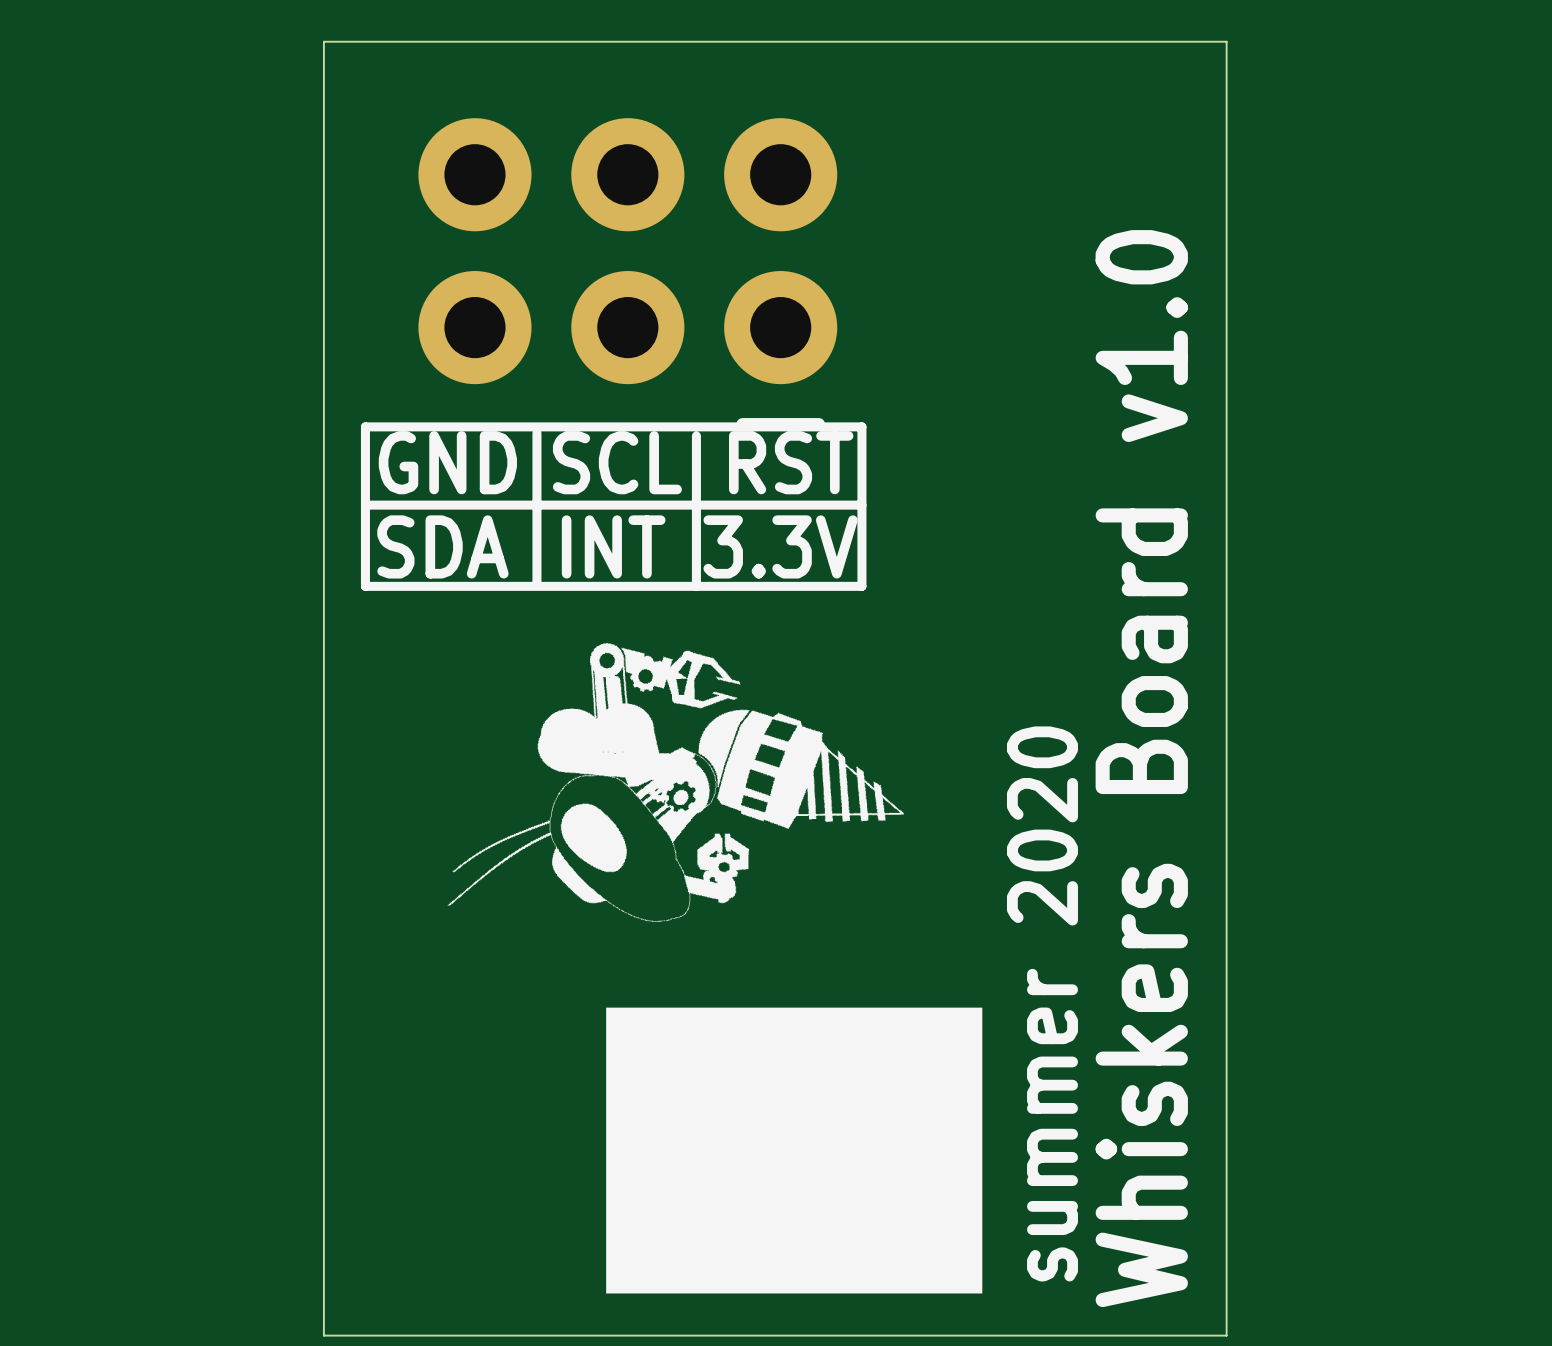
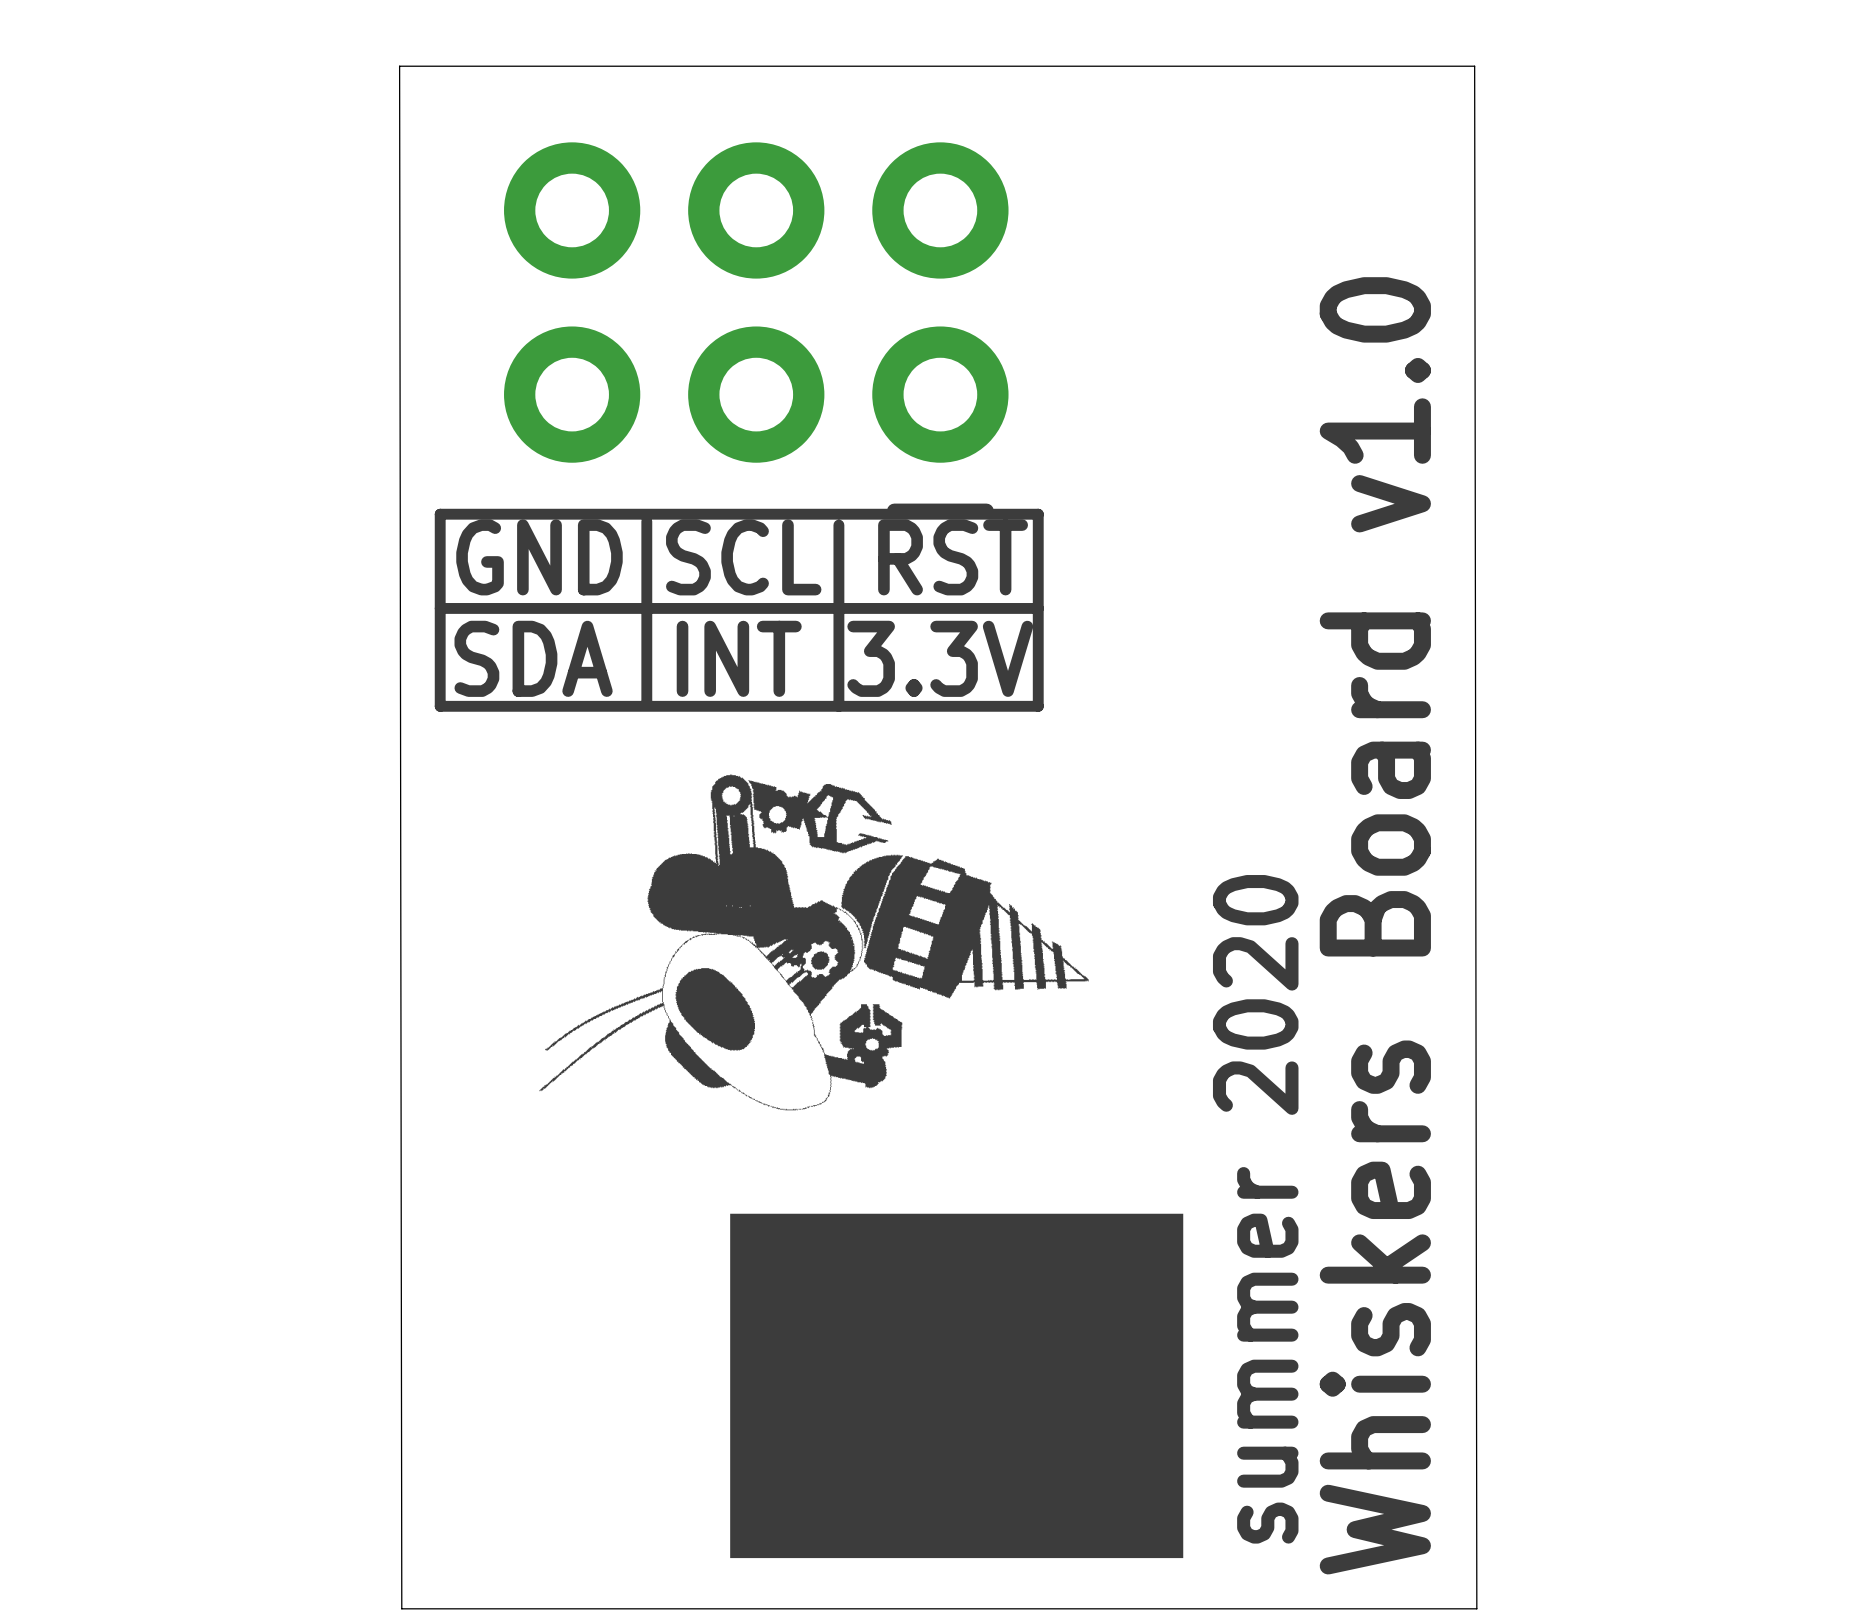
board edge: (1226, 1335) (1226, 41) (323, 41) (323, 1335) (333, 1335) -> (1476, 1608) (1474, 66) (399, 66) (401, 1608)

